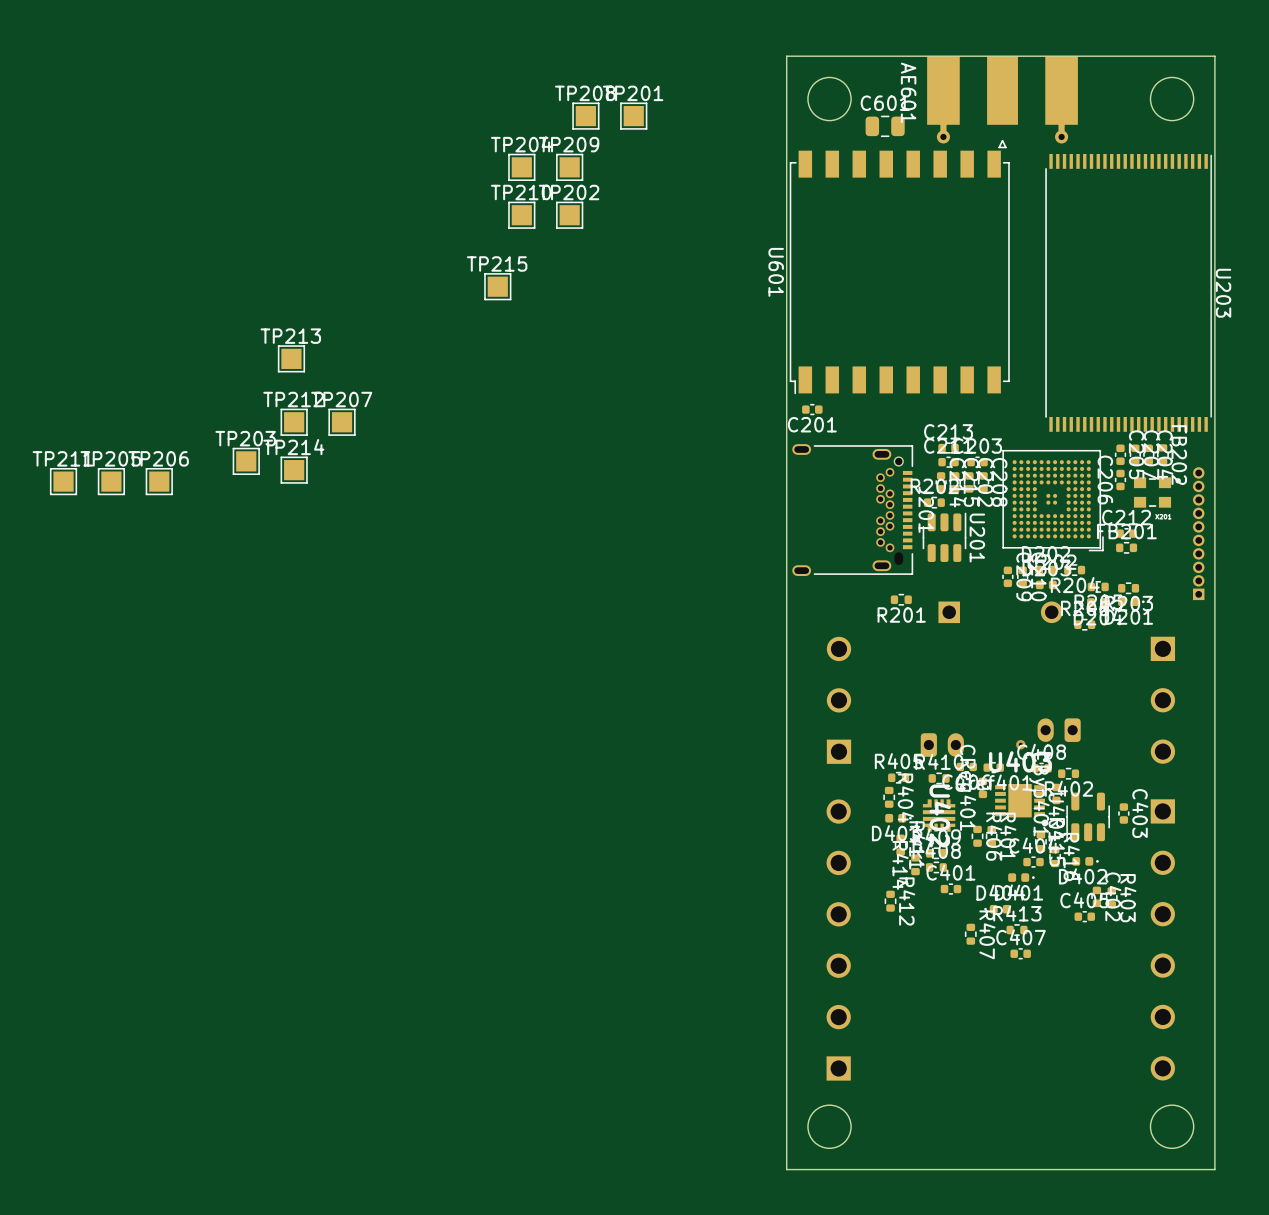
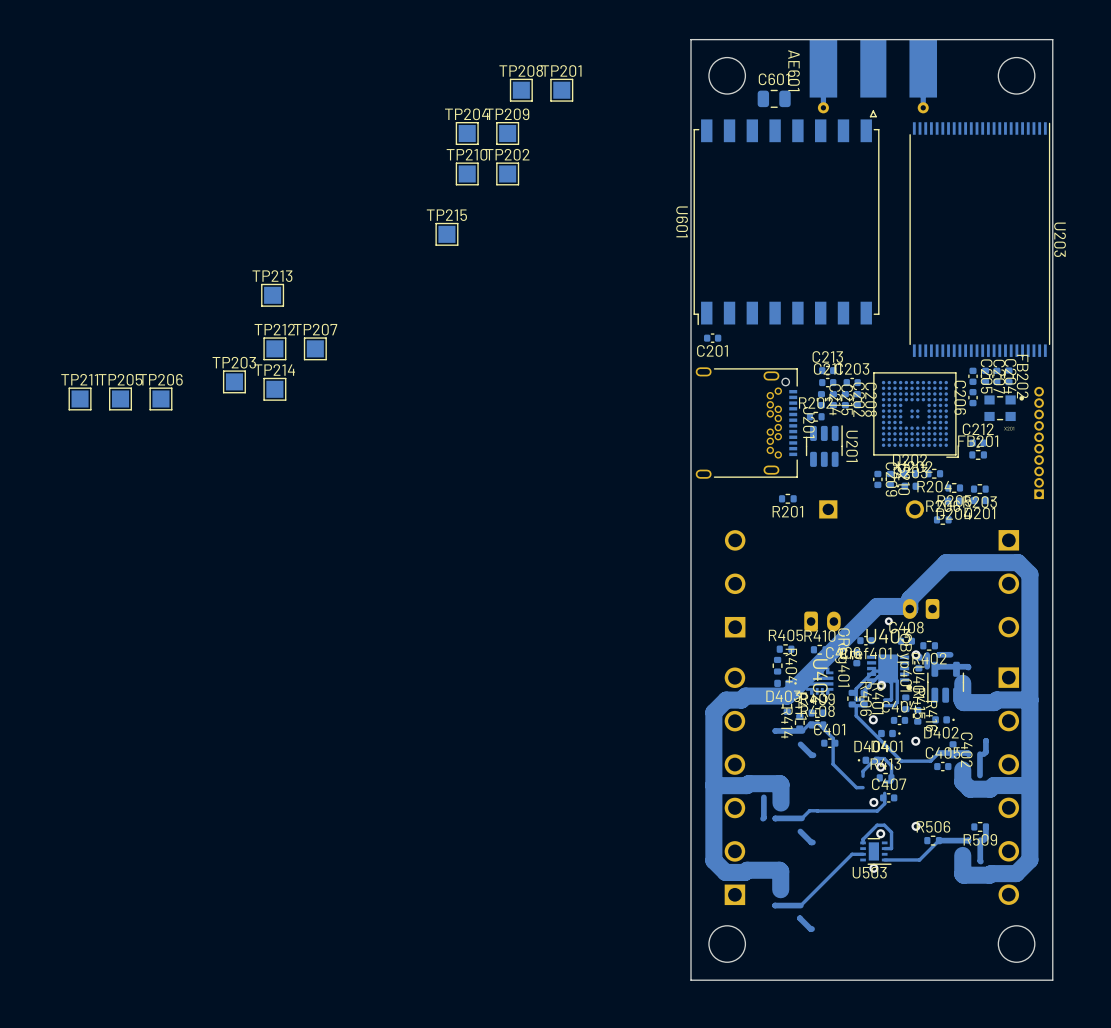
via: none -> (916, 654)
track: none -> (927, 654) (927, 666)
track: none -> (950, 654) (938, 654)
track: none -> (968, 667) (938, 668)
C403: (1123, 813) -> none
track: none -> (962, 683) (963, 702) (1029, 699)
via: none -> (881, 685)
track: none -> (863, 694) (863, 691) (878, 676) (885, 676) (891, 683) (891, 699) (884, 699)
track: none -> (863, 699) (856, 699) (856, 688) (873, 671) (887, 671) (897, 680) (897, 702) (894, 705) (884, 705)
track: none -> (863, 705) (856, 705) (856, 715) (901, 761) (930, 761) (938, 753) (968, 754)
via: none -> (873, 719)
track: none -> (775, 730) (802, 730) (810, 723) (817, 723) (833, 738) (833, 764) (856, 787) (863, 787)
via: none -> (915, 741)
track: none -> (986, 740) (985, 752) (983, 754)
track: none -> (800, 744) (813, 755)
R403: (1111, 897) -> none
R412: (890, 901) -> none
track: none -> (979, 754) (979, 775)
via: none -> (880, 767)
track: none -> (962, 769) (962, 781) (970, 789) (990, 789) (993, 785) (1028, 785)
track: none -> (863, 776) (863, 771) (875, 758) (884, 758) (891, 765) (891, 781) (884, 781)
R407: (970, 934) -> none
track: none -> (713, 785) (779, 783) (781, 803)
track: none -> (884, 793) (884, 803) (877, 810) (809, 810) (801, 818) (775, 818)
track: none -> (763, 797) (763, 818)
via: none -> (873, 802)
via: none -> (916, 826)
R509: none -> (980, 826)
track: none -> (985, 826) (985, 838) (983, 840)
track: none -> (800, 831) (812, 842)
via: none -> (880, 833)
track: none -> (968, 840) (938, 840) (919, 859) (884, 859)
track: none -> (980, 840) (980, 861)
R506: none -> (933, 840)
track: none -> (863, 842) (863, 839) (877, 825) (884, 825) (891, 832) (891, 848) (884, 848)
U503: none -> (875, 851)
track: none -> (863, 854) (852, 854) (800, 905) (775, 905)
track: none -> (962, 855) (963, 875) (1016, 873) (1029, 859) (1029, 574) (1018, 562) (946, 562) (909, 599) (909, 608) (907, 606) (877, 606) (787, 696) (745, 696) (741, 700) (726, 700) (713, 712) (713, 860) (725, 872) (779, 870) (780, 889)
via: none -> (873, 868)
track: none -> (799, 918) (812, 929)

